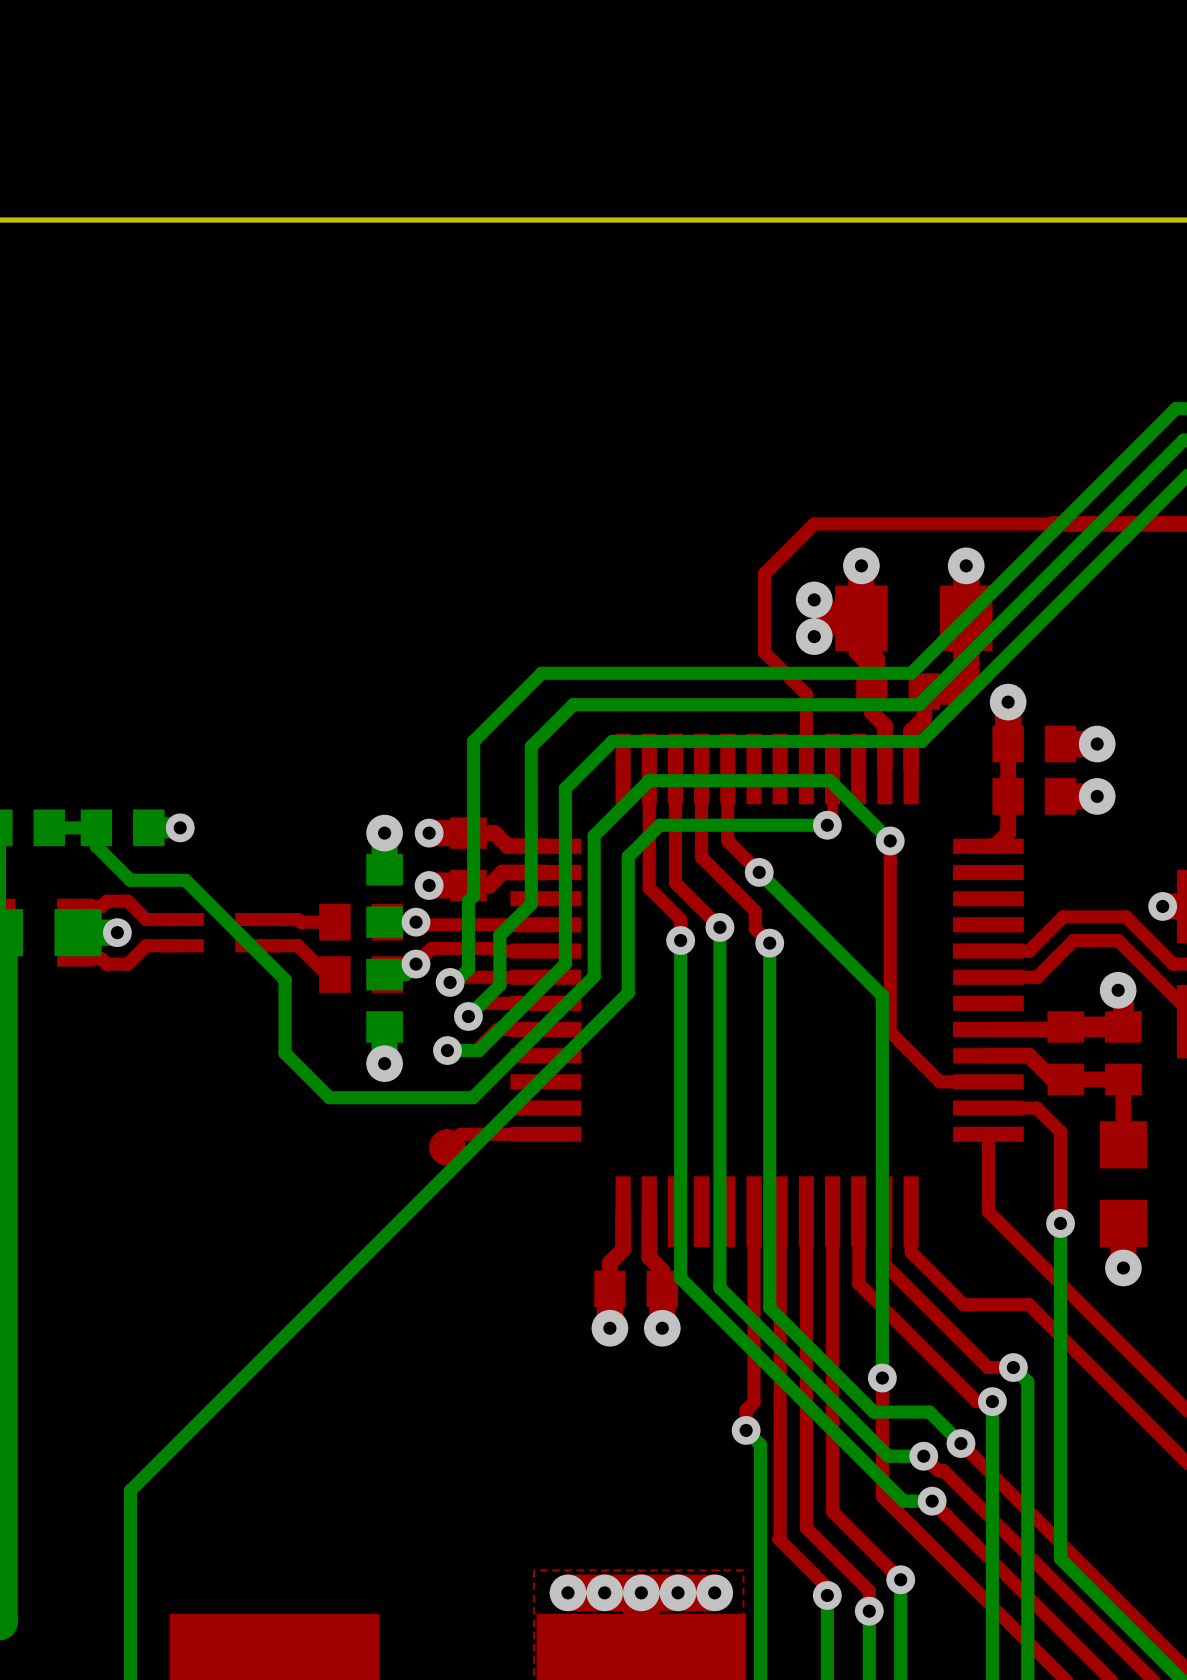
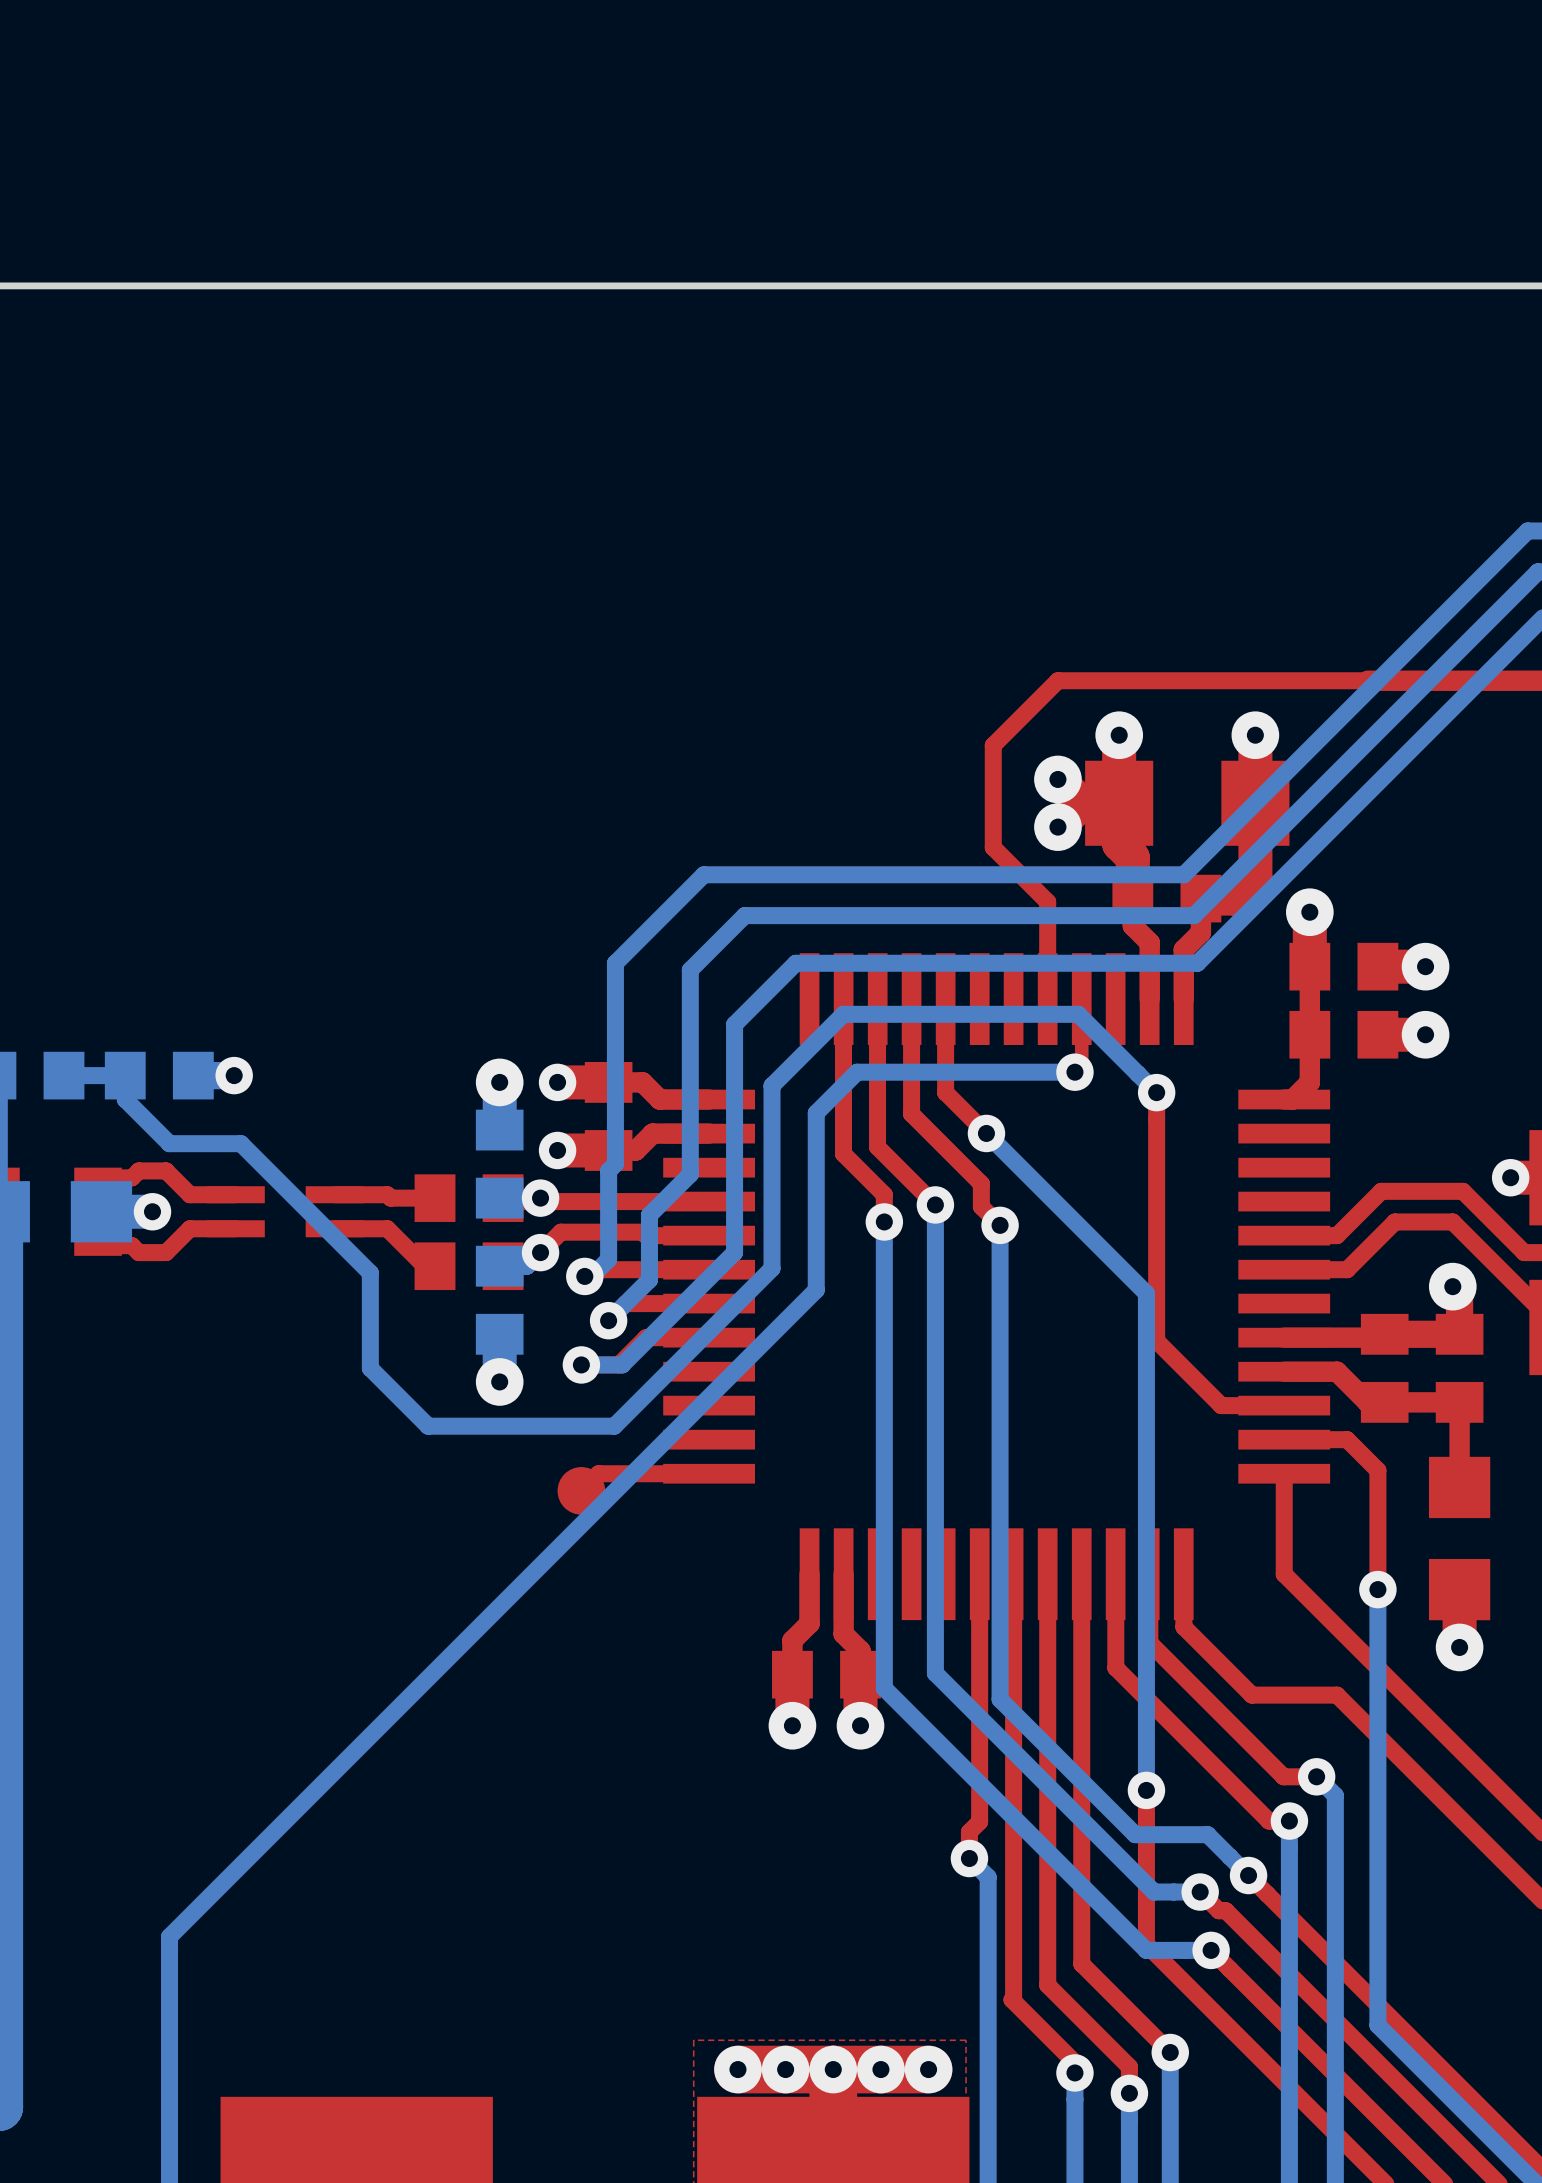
bottom track: (680, 1278) (903, 1501) -> (884, 1660) (884, 1688) (1146, 1950) (1173, 1950)

